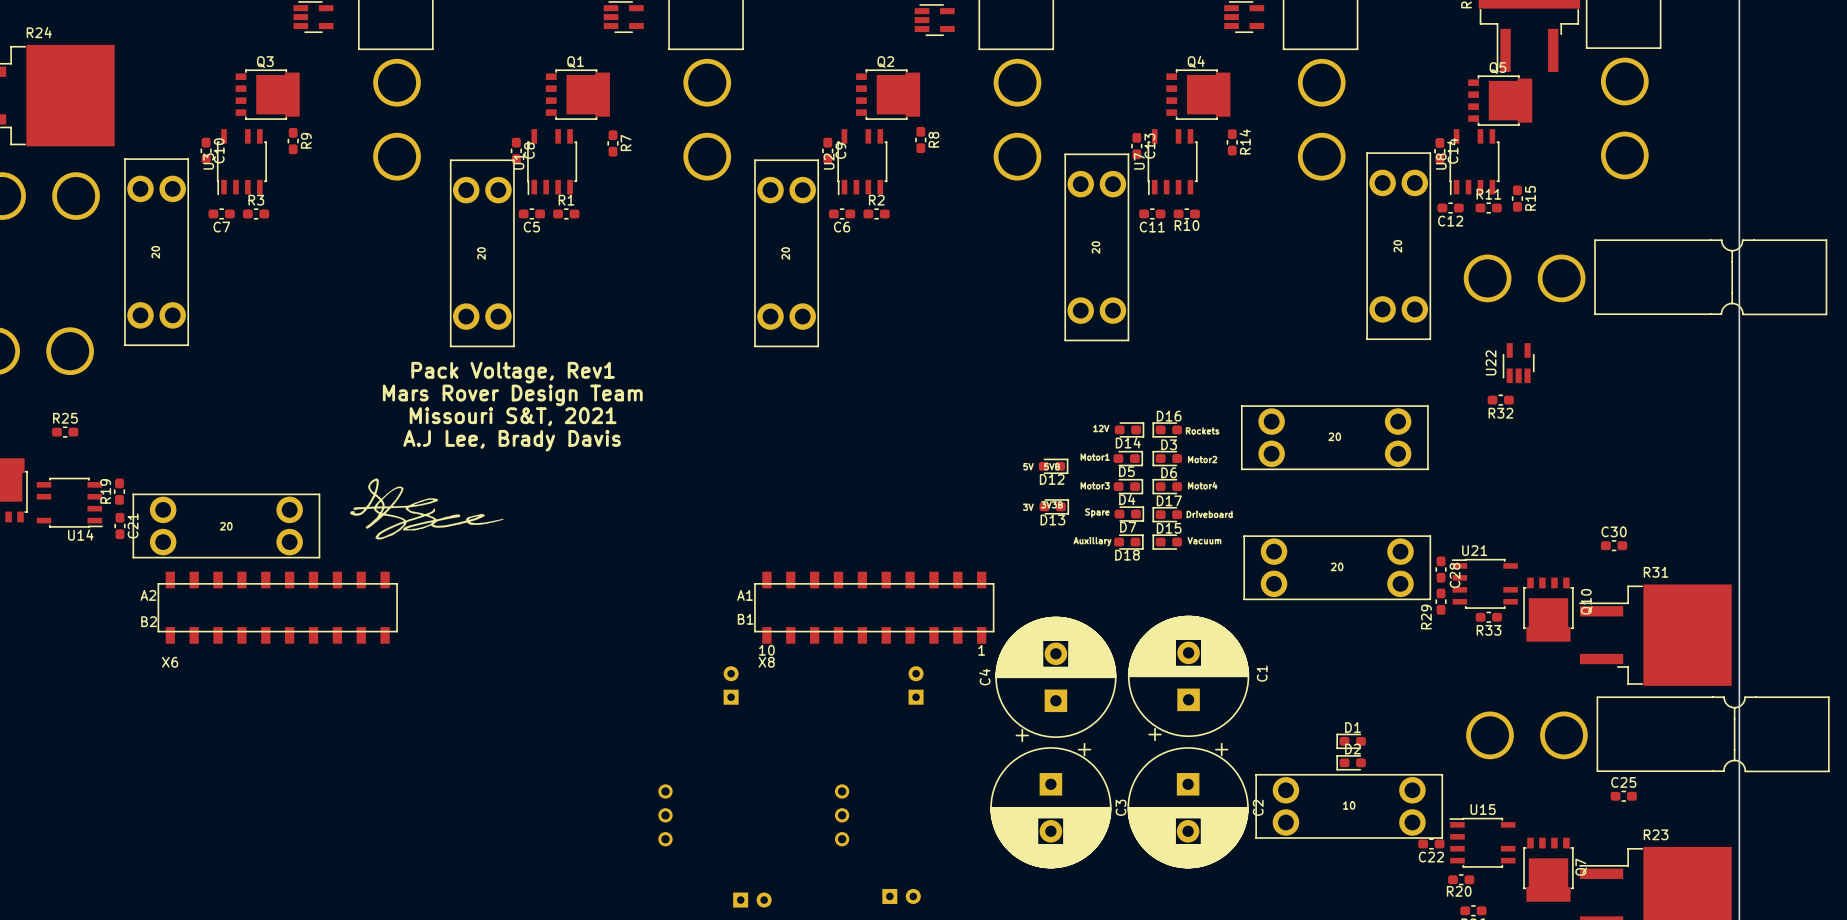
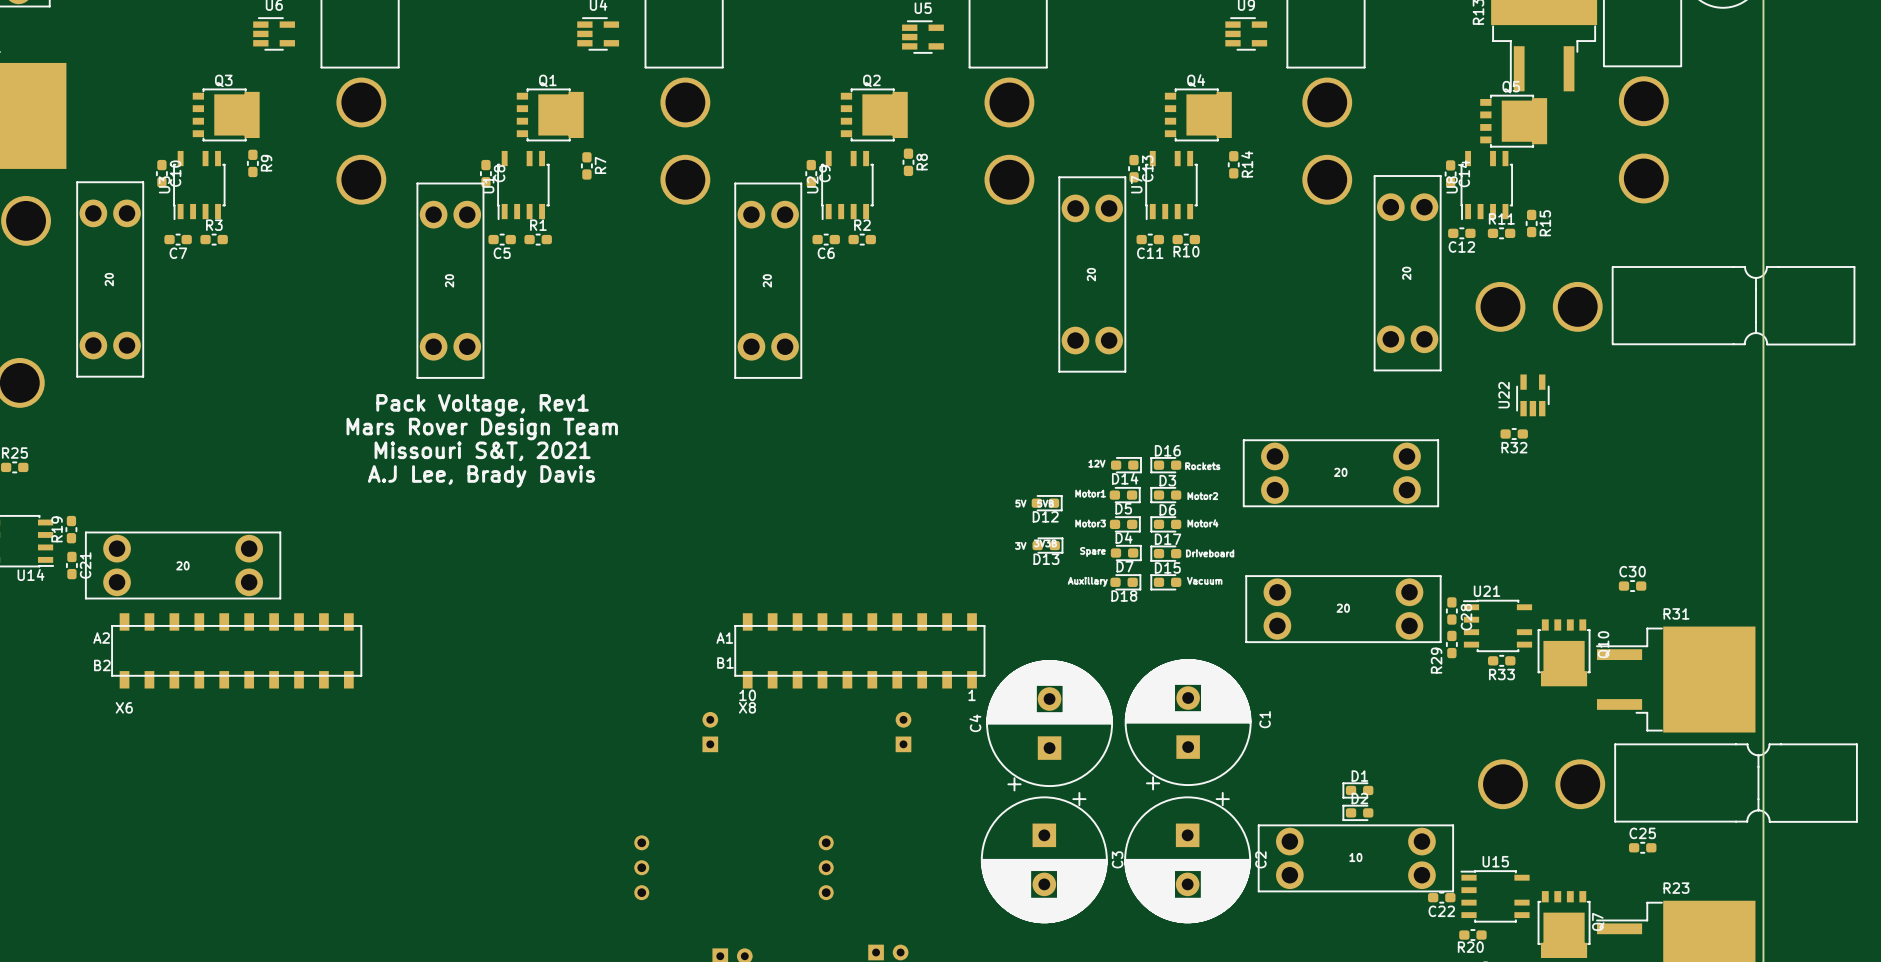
drawing: [340, 478, 504, 592] -> none

